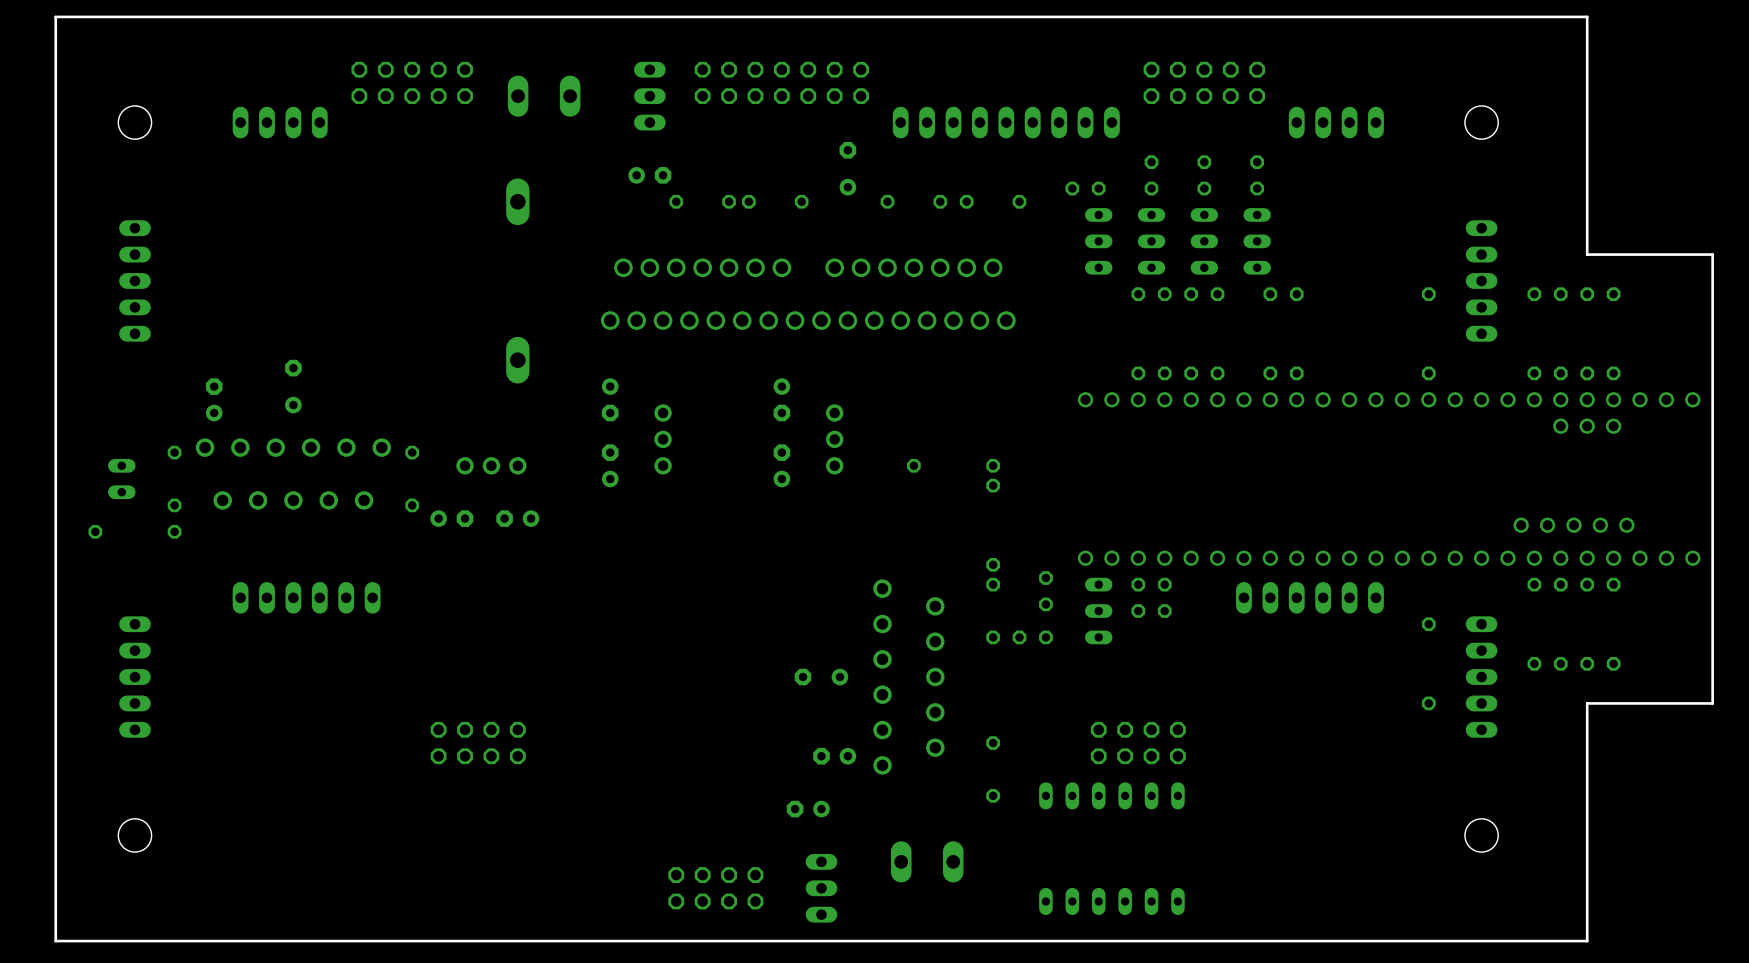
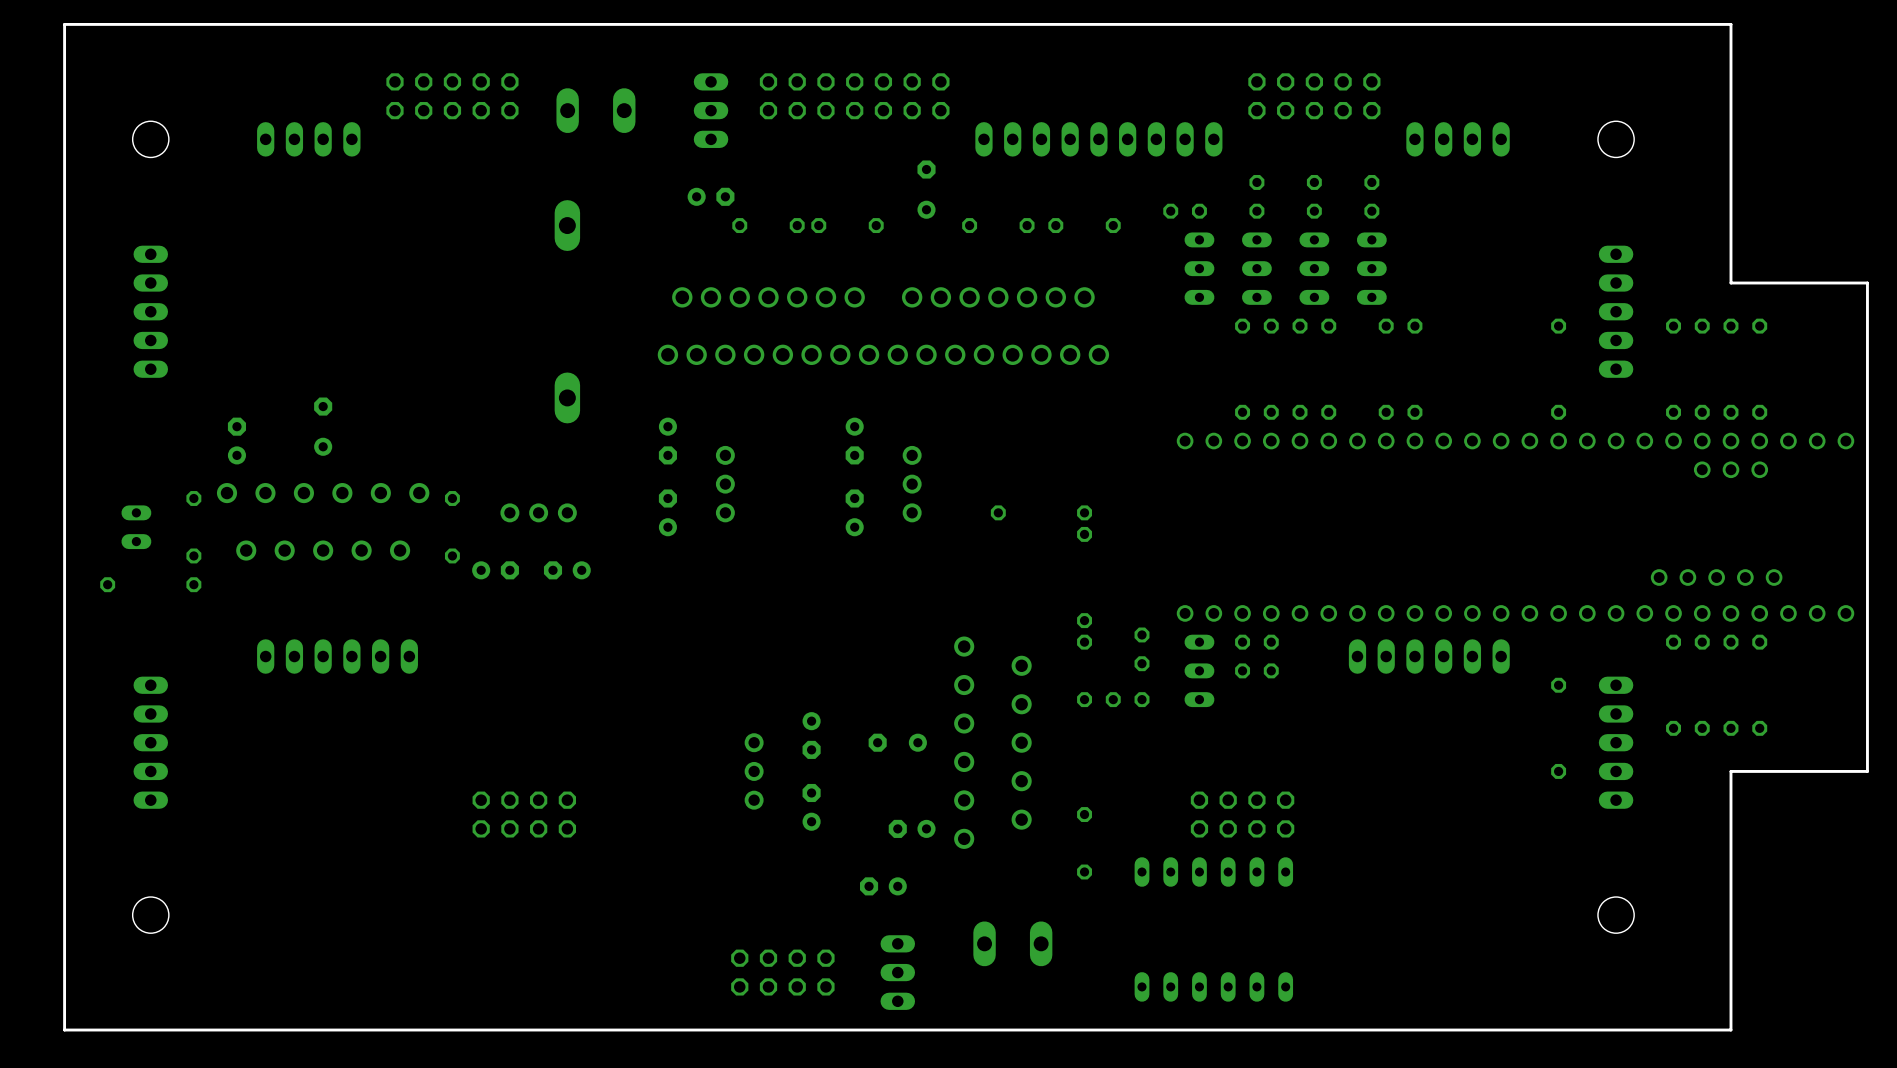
part: none -> (811, 735)
part: none -> (754, 771)
part: none -> (811, 807)

